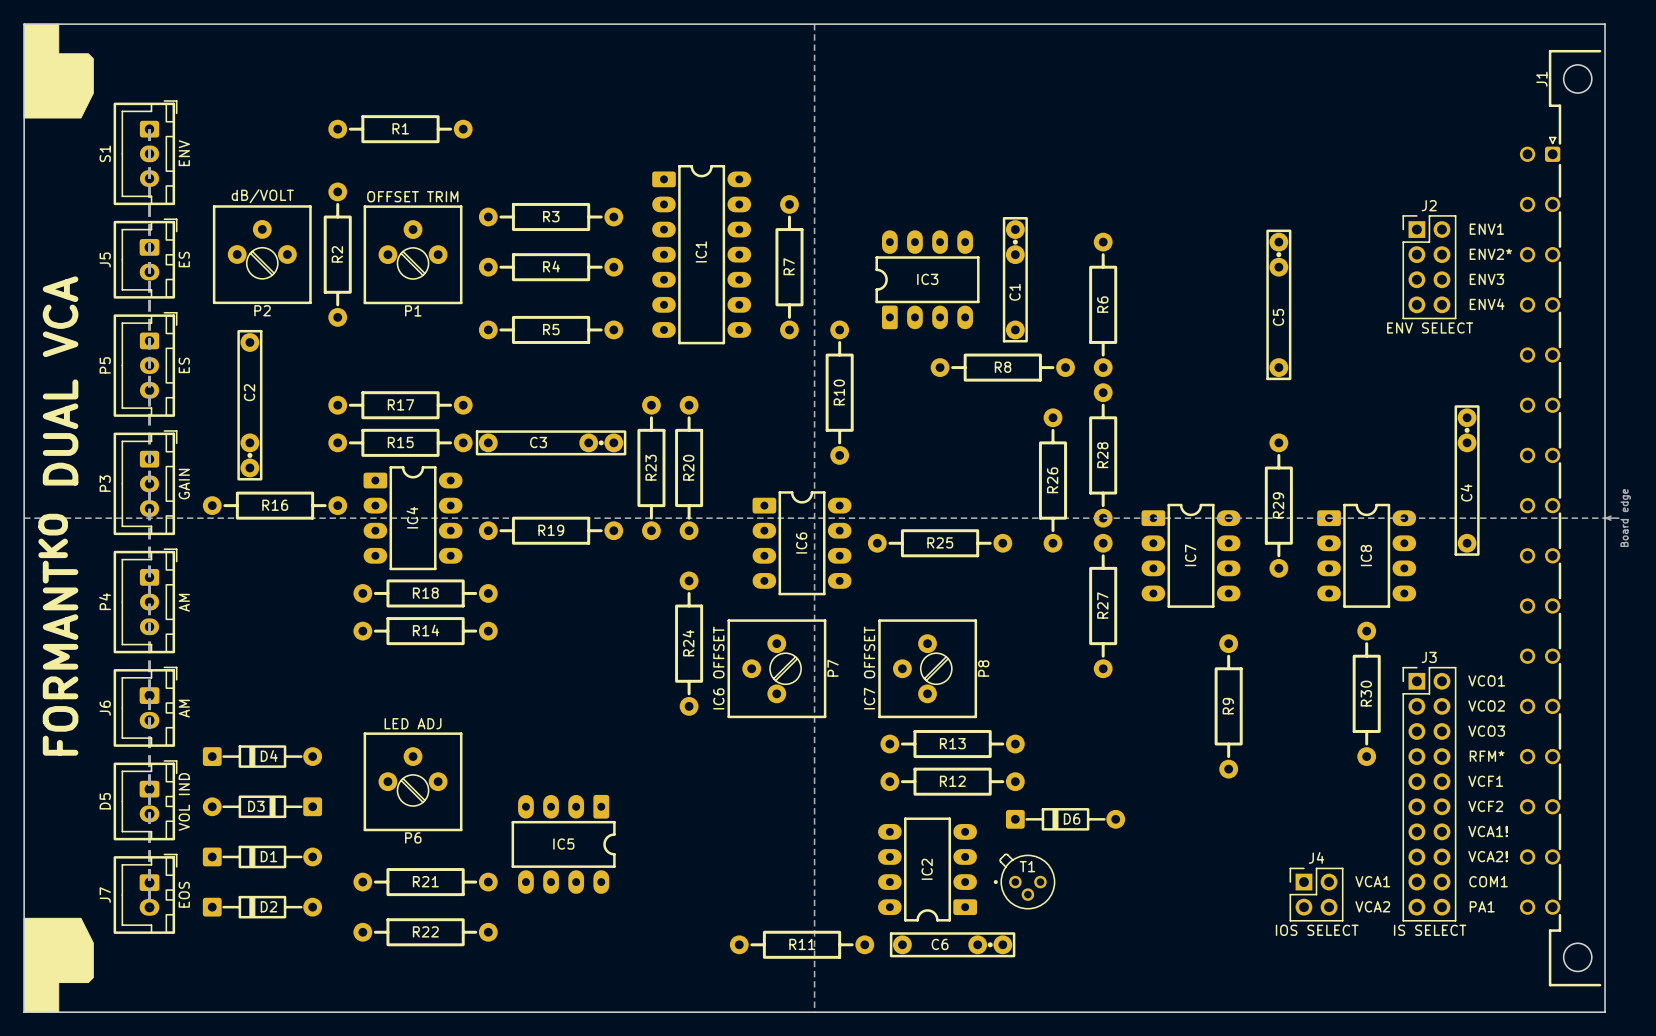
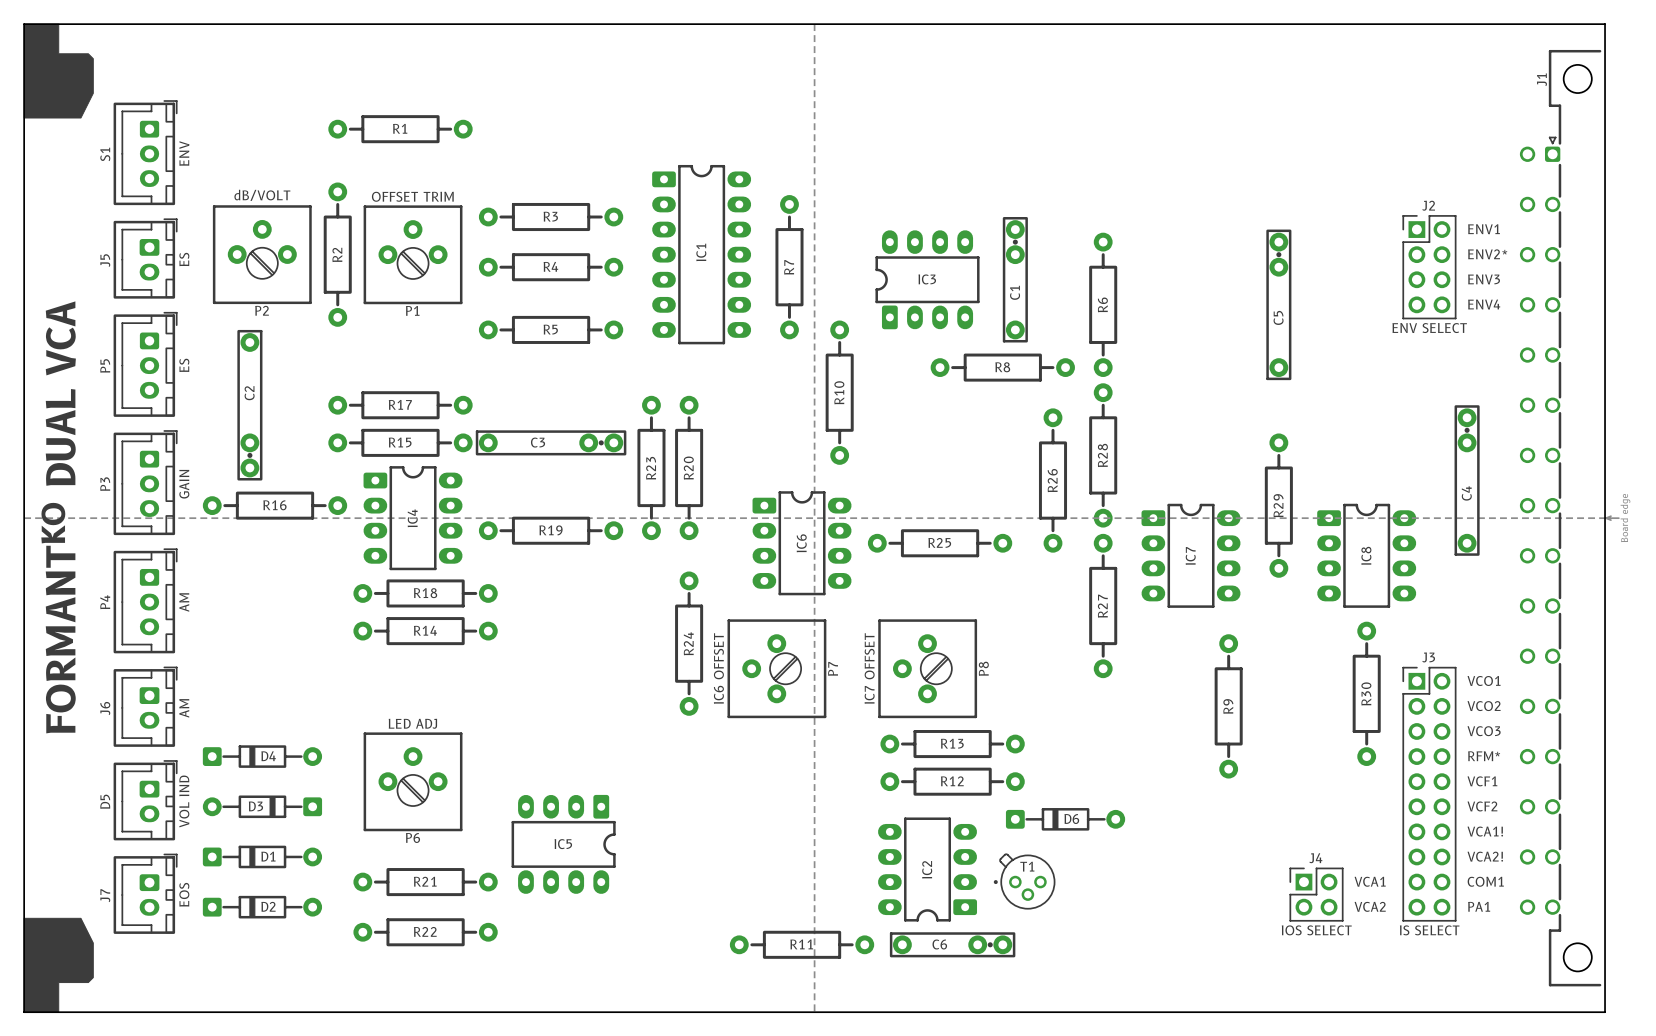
line: (149, 129) (149, 907) -> none

